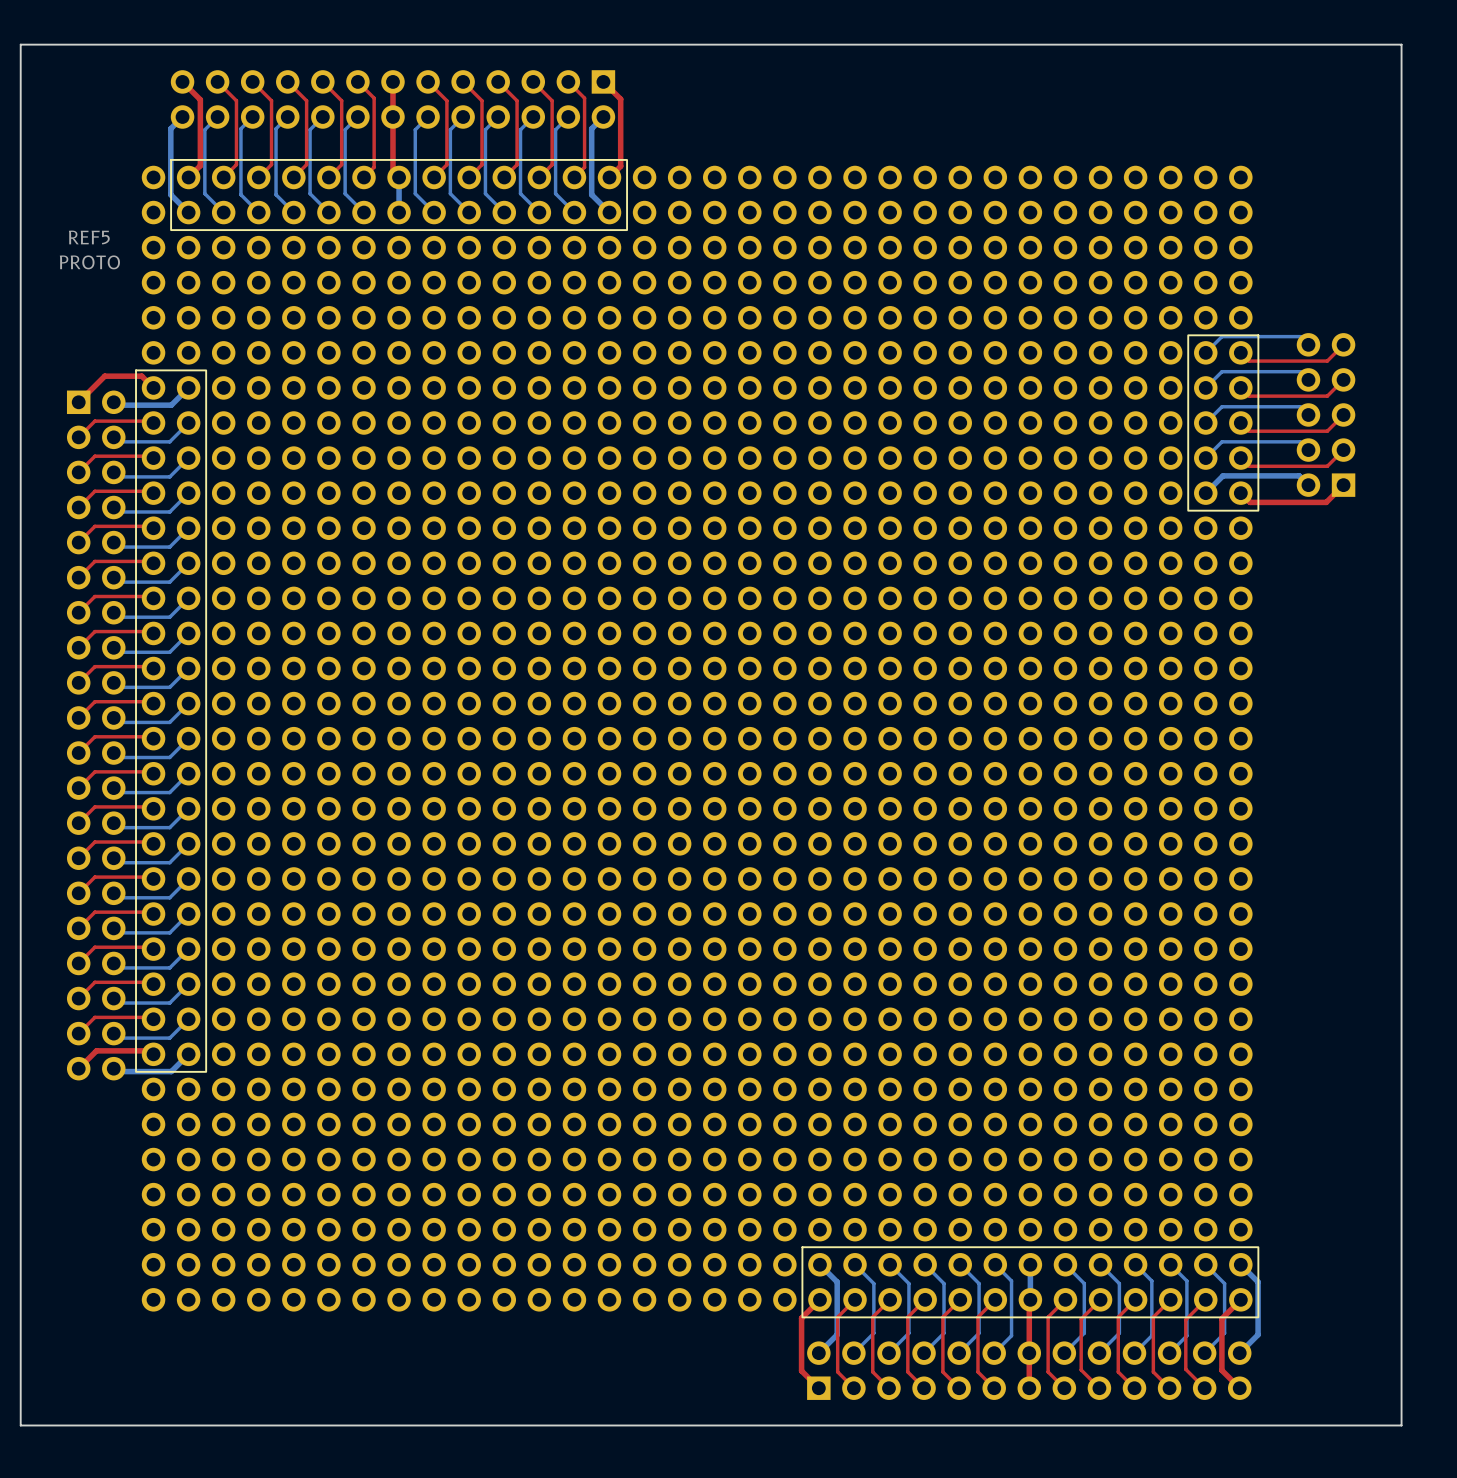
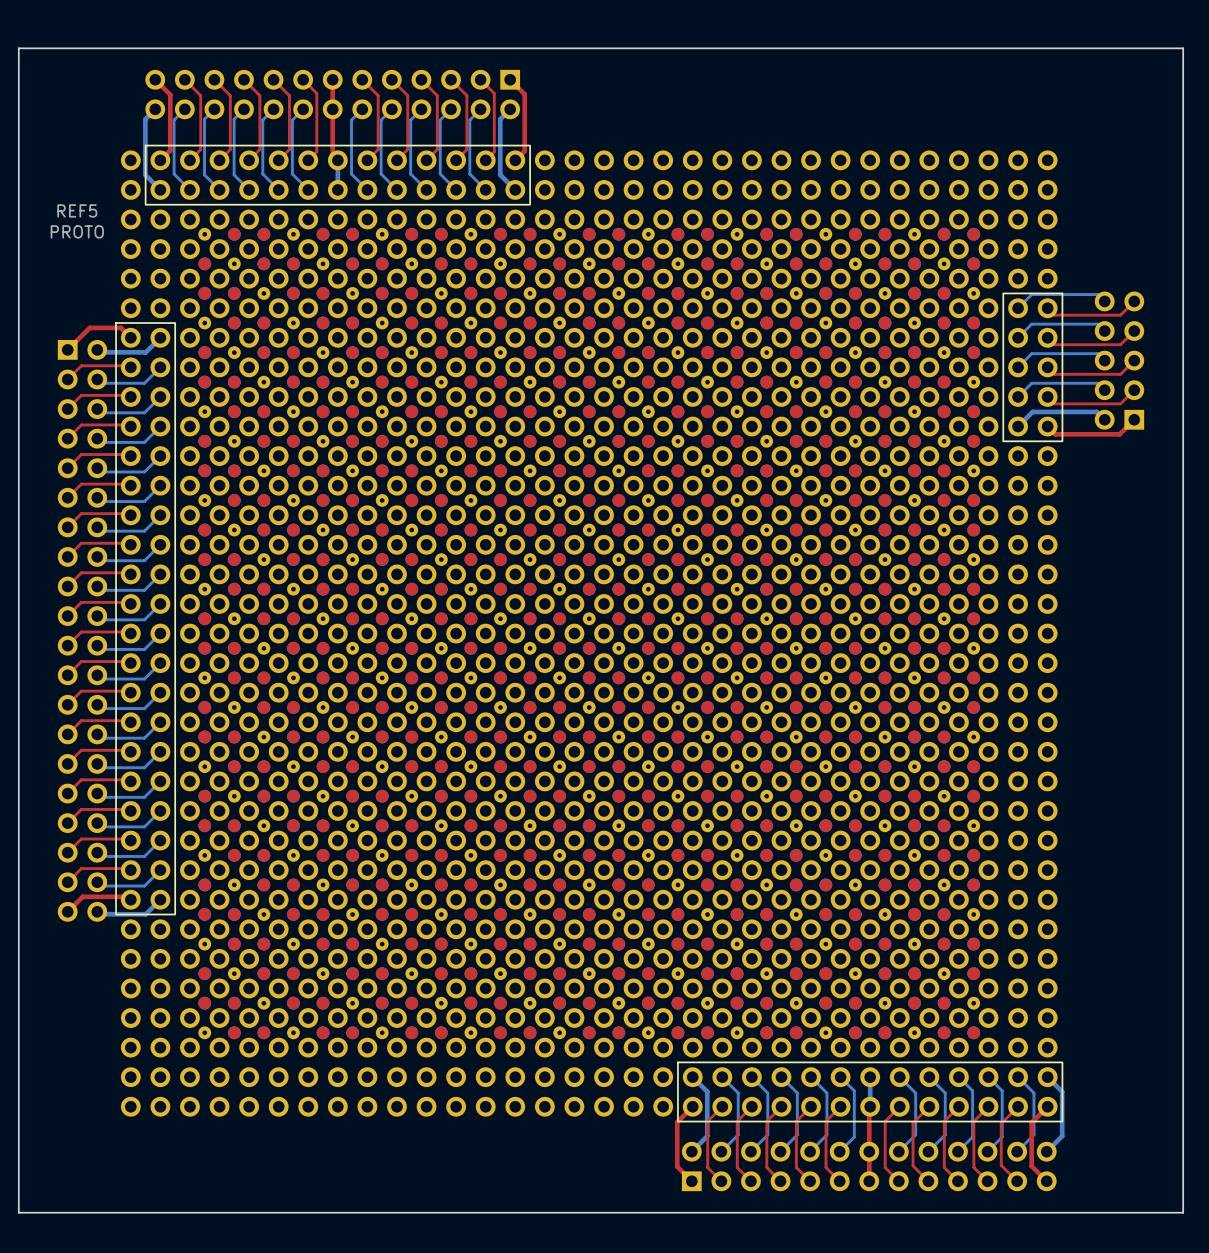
REF5 footprint: [135, 159, 1260, 1319] -> [115, 144, 1064, 1123]

